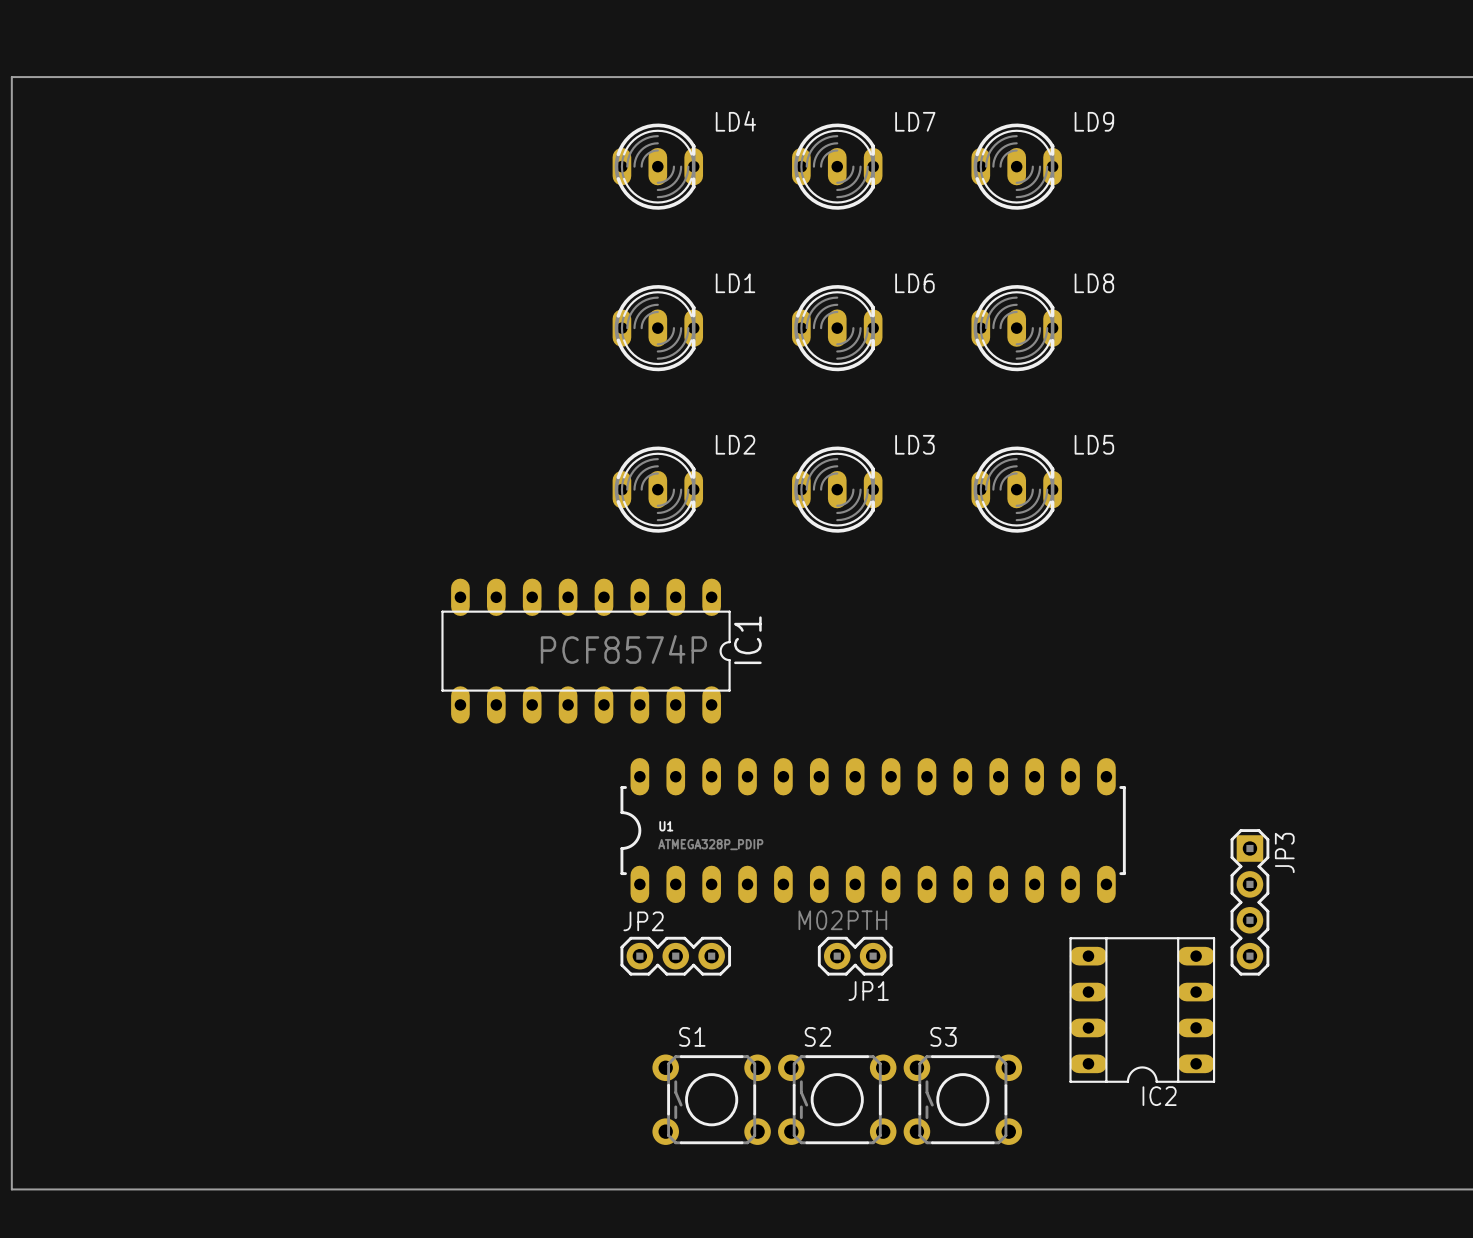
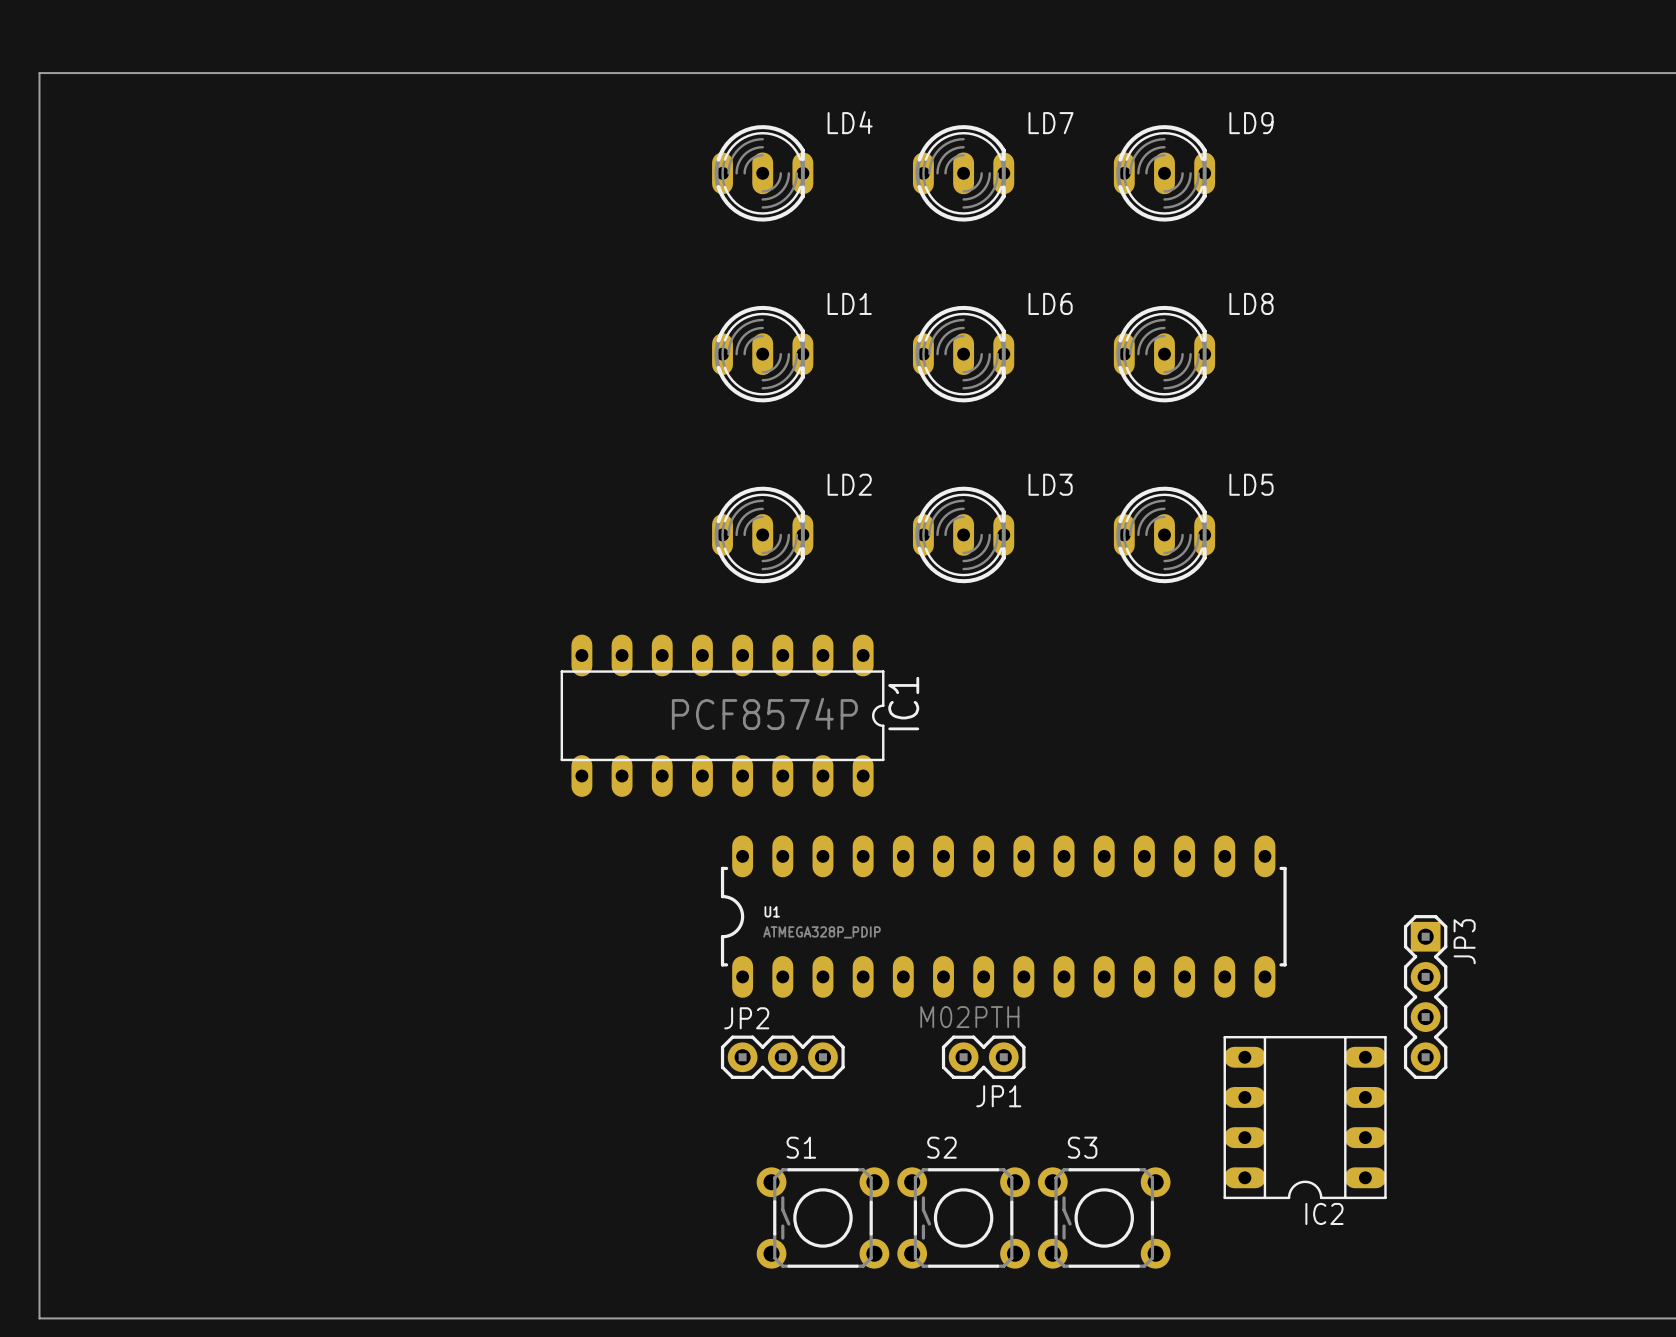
IC1 position: (586, 651) -> (722, 715)

